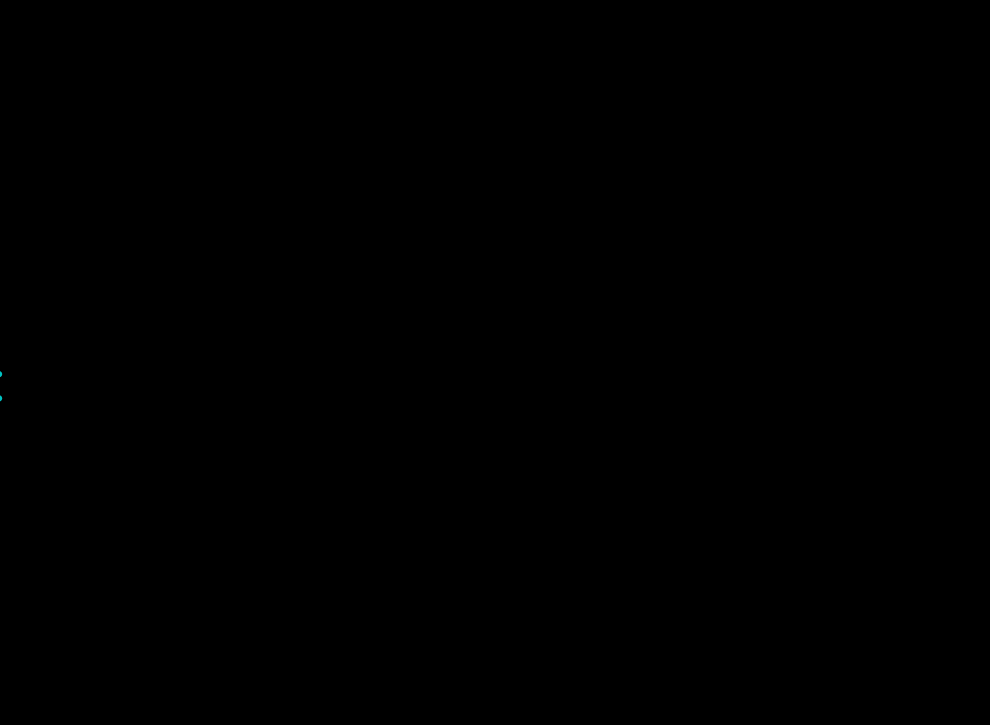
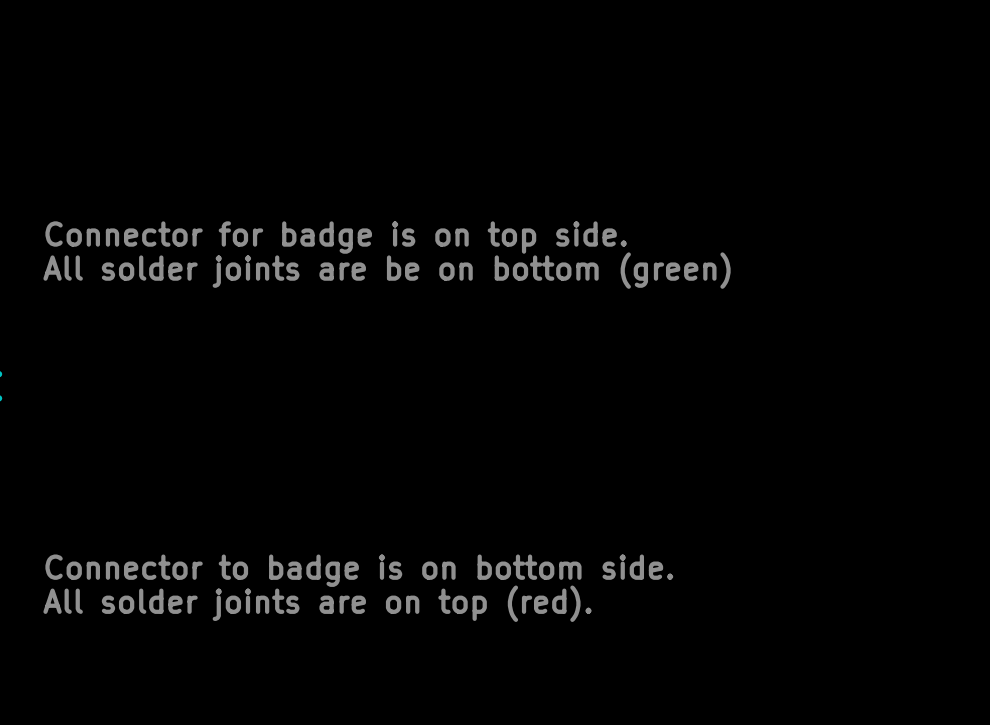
text: none -> Connector for badge is on top side. (336, 237)
text: none -> All solder joints are be on bottom (green) (387, 270)
text: none -> Connector to badge is on bottom side. (359, 570)
text: none -> All solder joints are on top (red). (317, 603)

